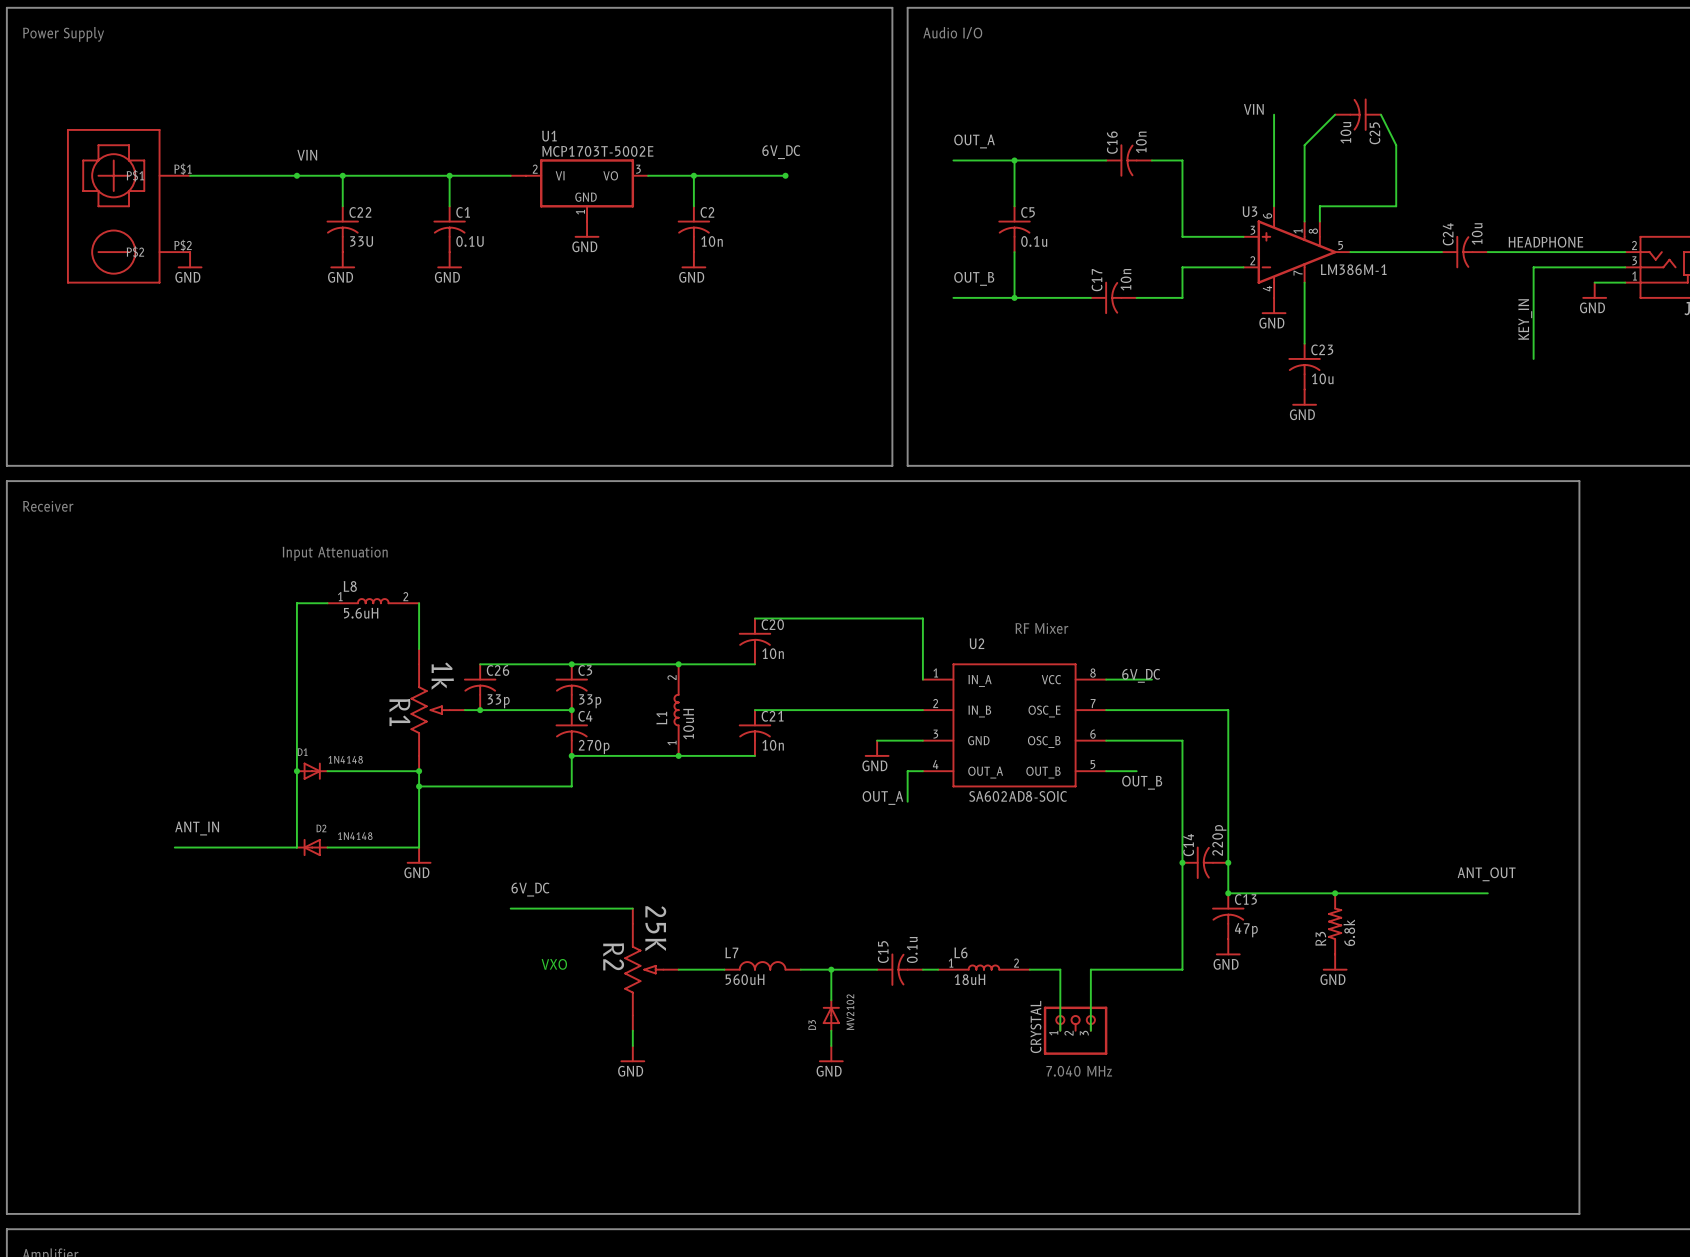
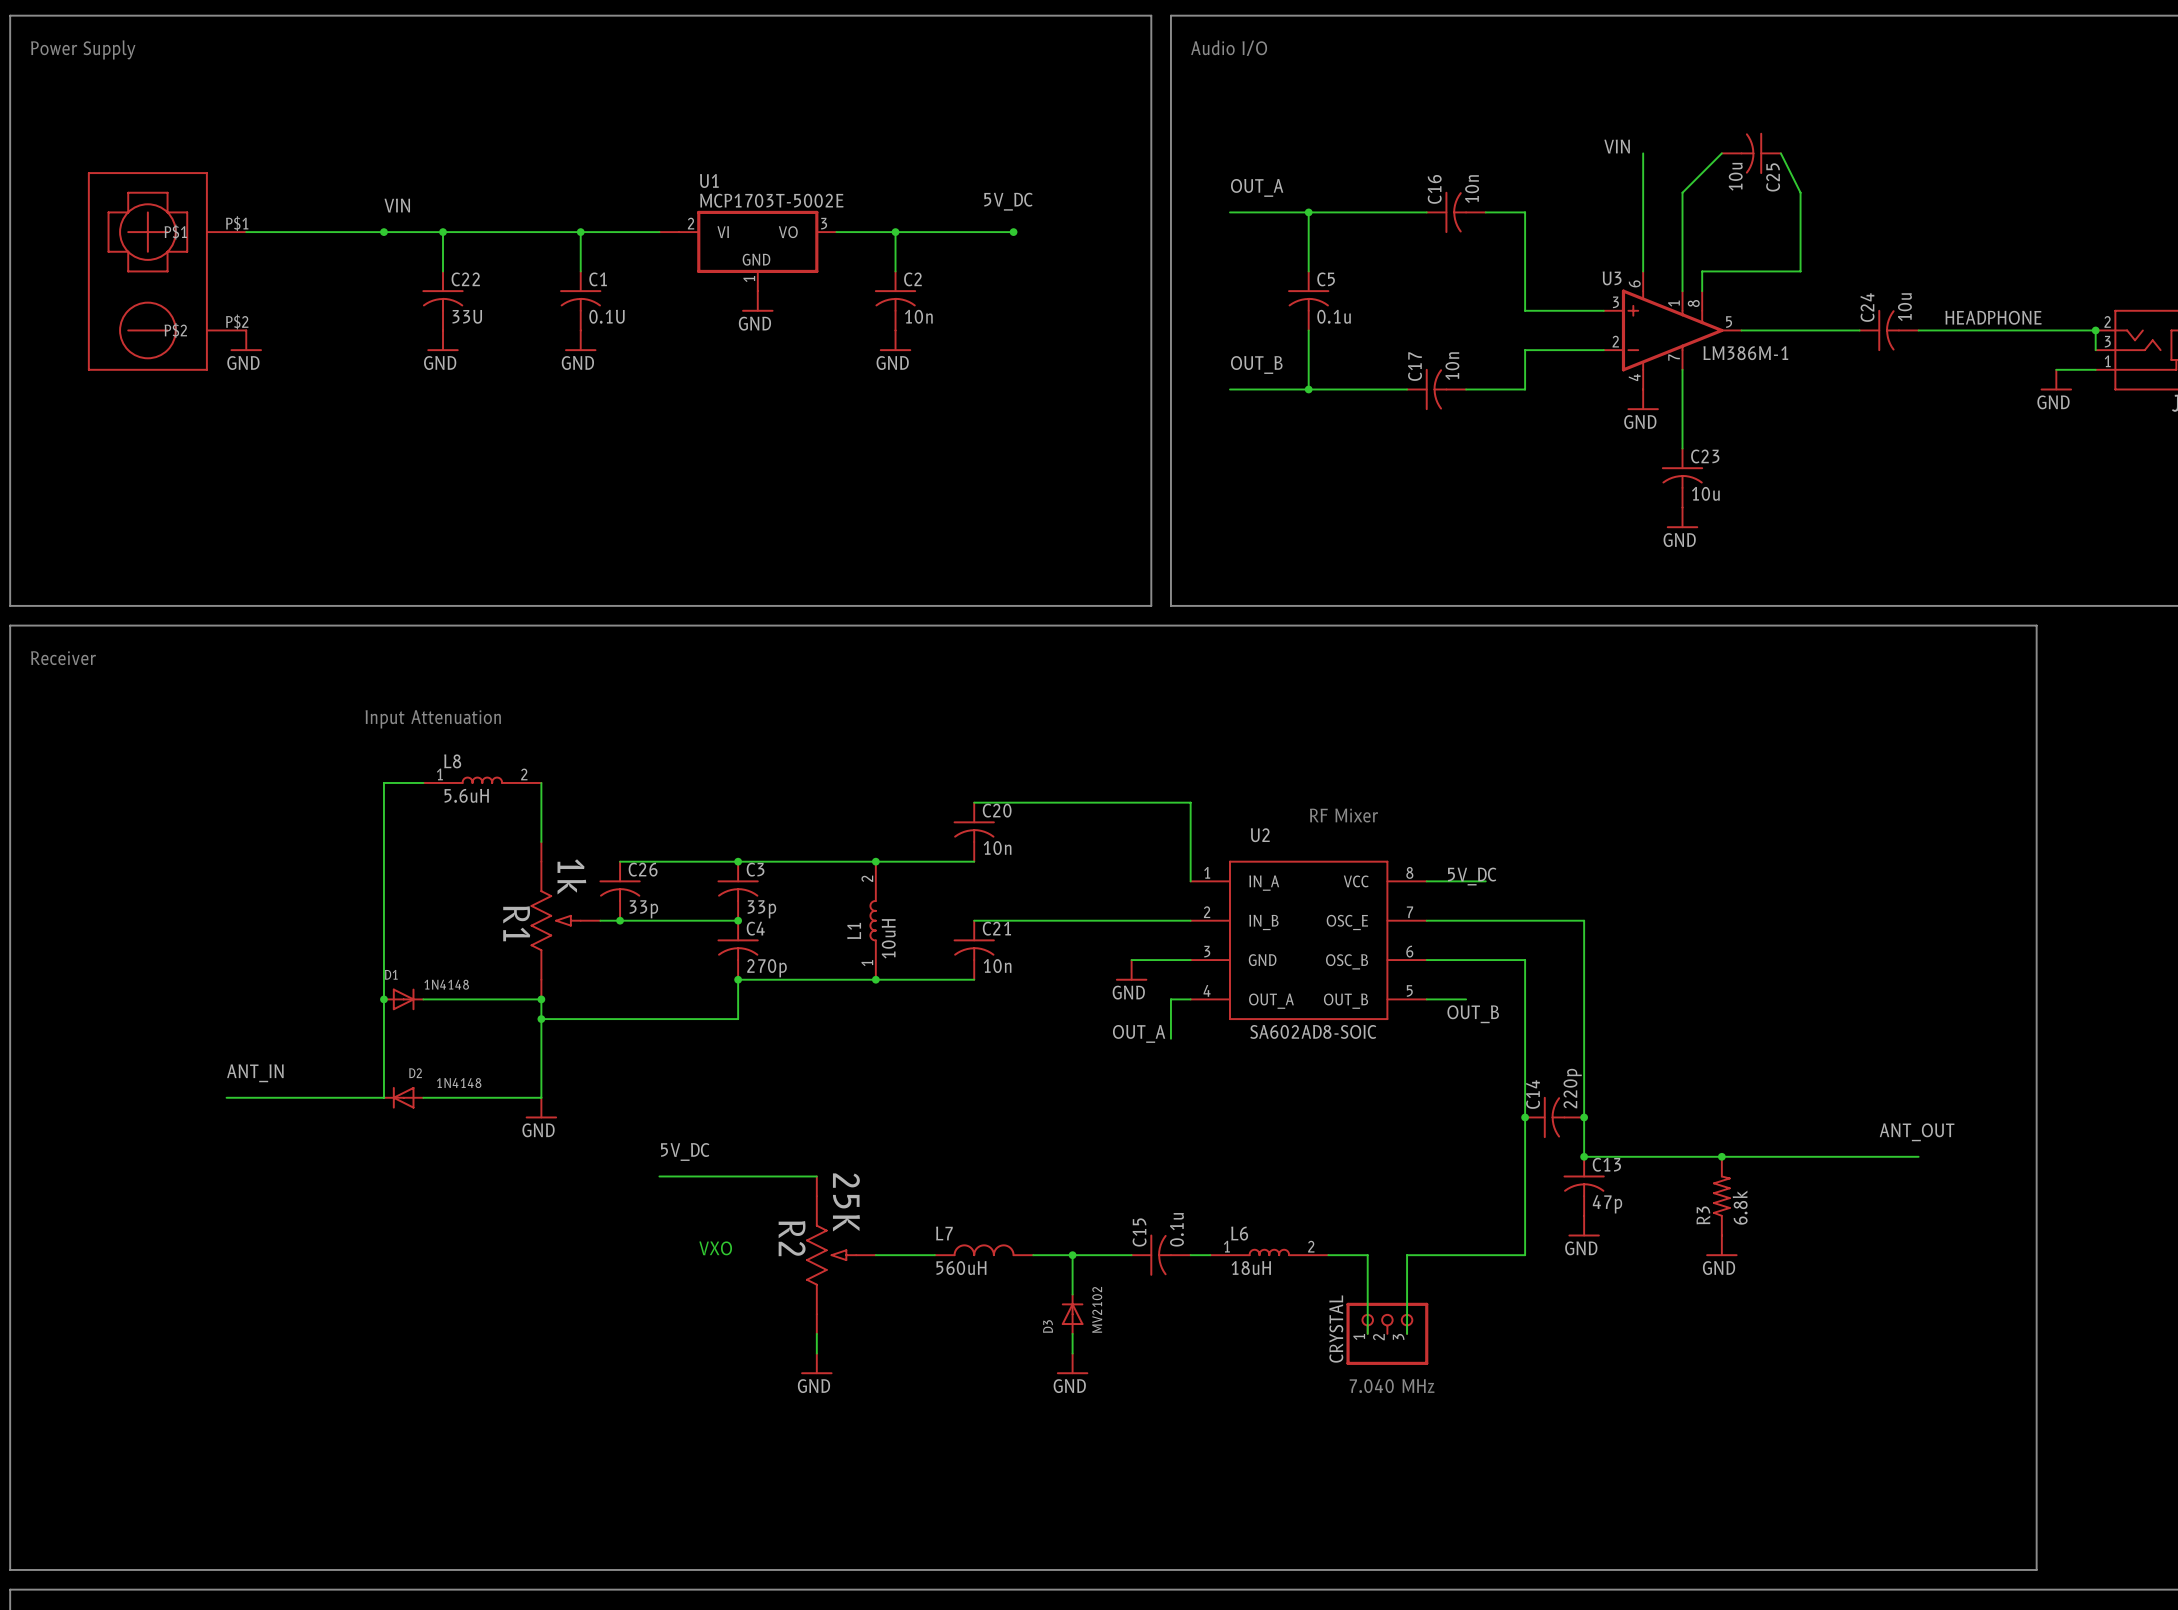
label: 6V_DC (781, 152) -> 5V_DC (1008, 201)
junction: none -> (2095, 330)
wire: (1625, 267) (1533, 267) (1533, 358) -> (2095, 350) (2095, 330)
label: KEY_IN (1525, 319) -> none
label: 6V_DC (1141, 675) -> 5V_DC (1472, 876)
label: 6V_DC (530, 889) -> 5V_DC (685, 1151)

